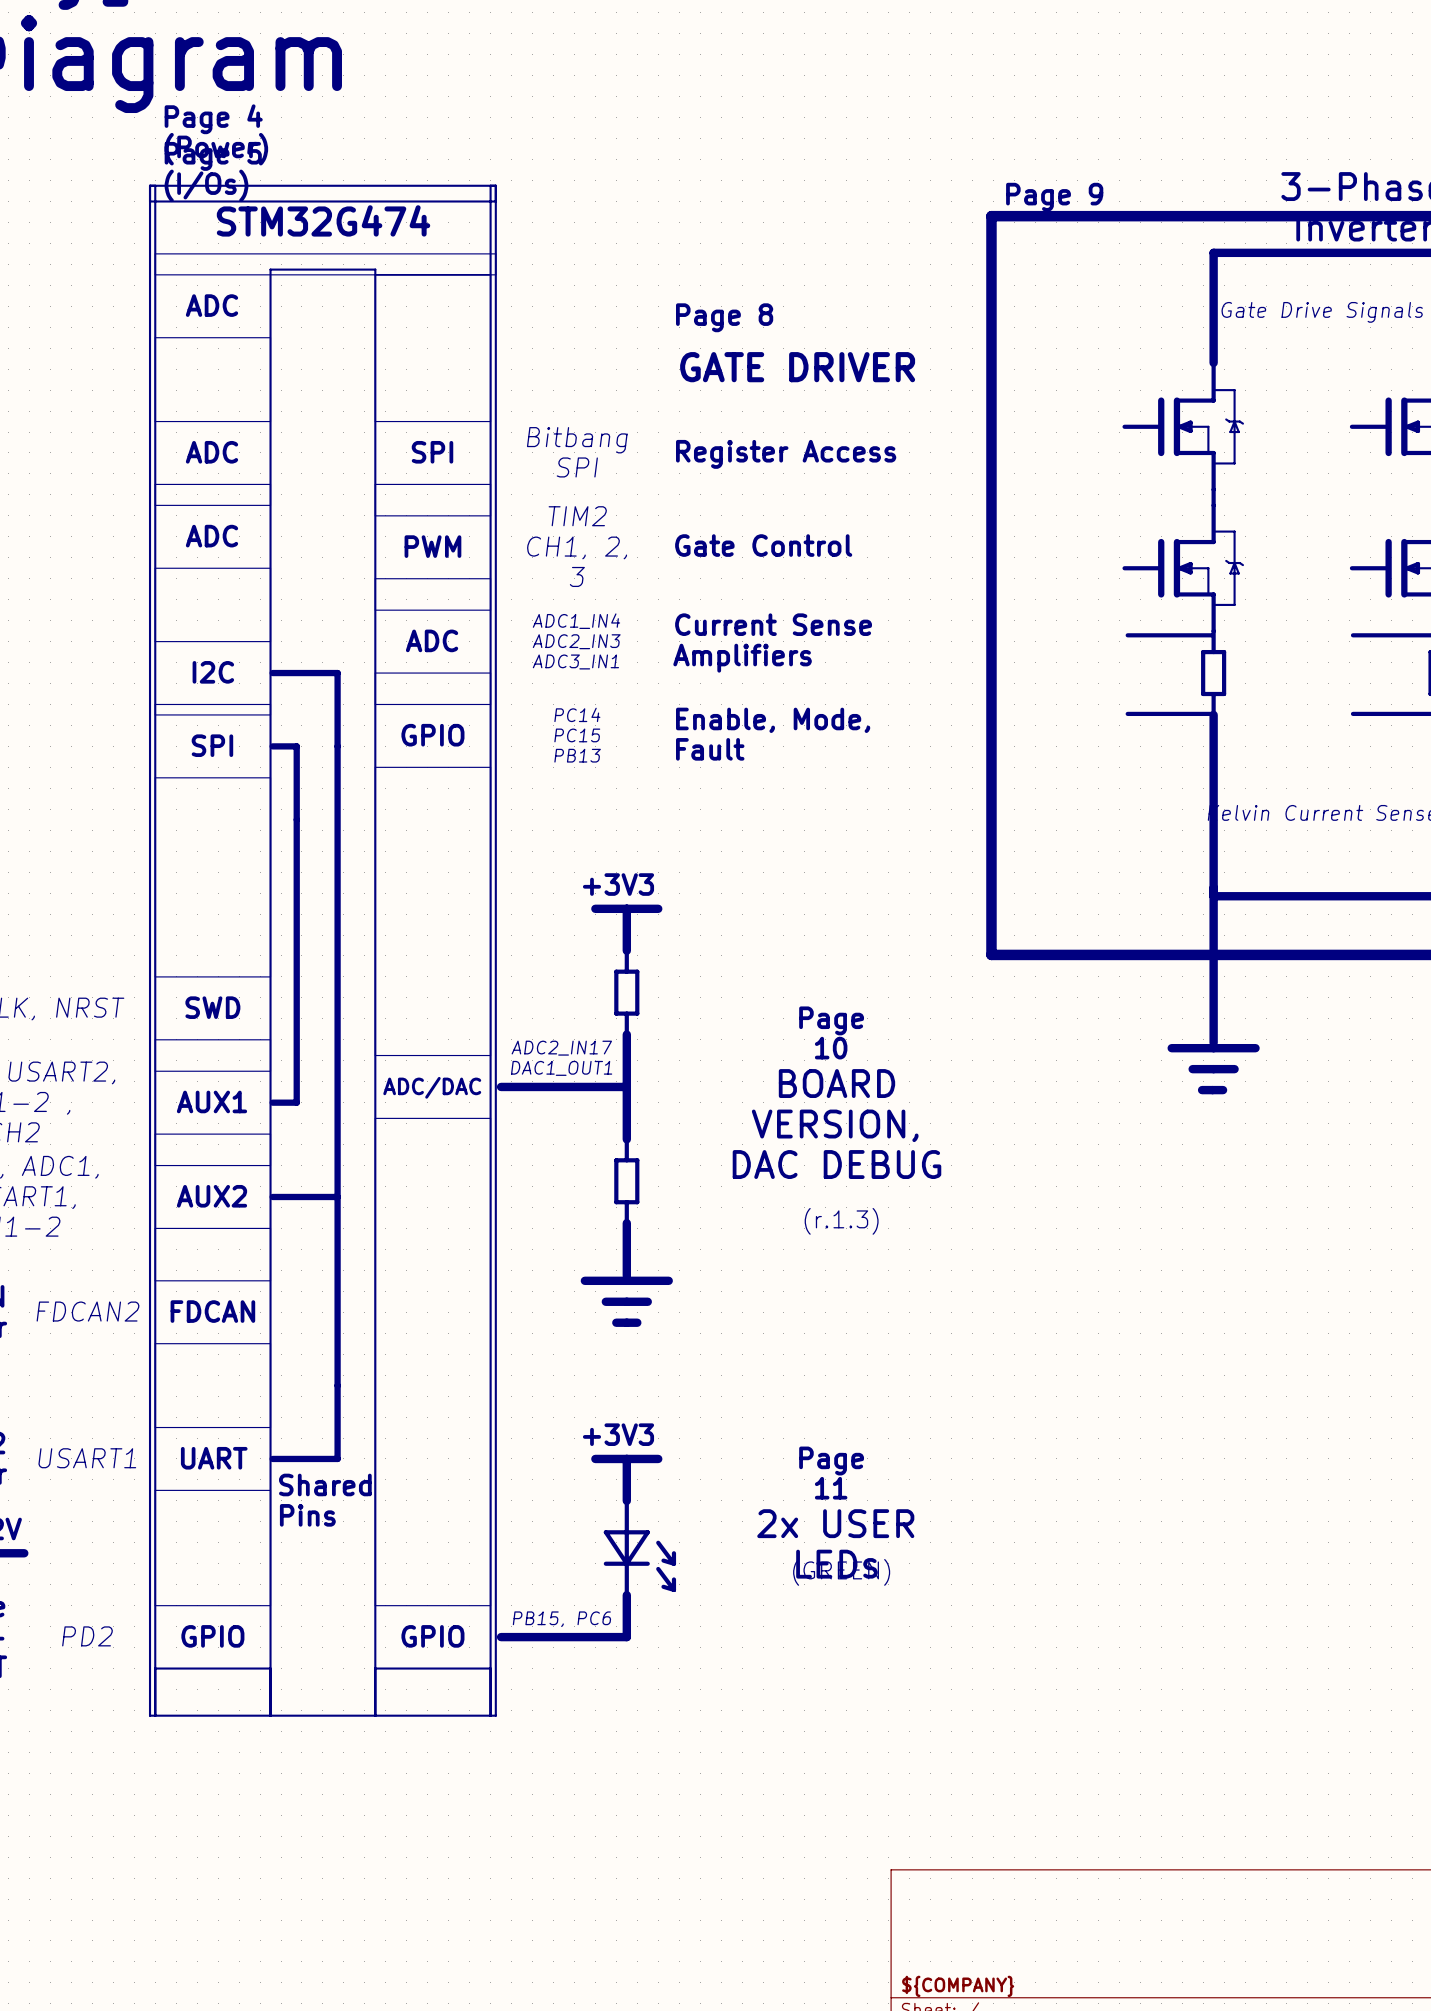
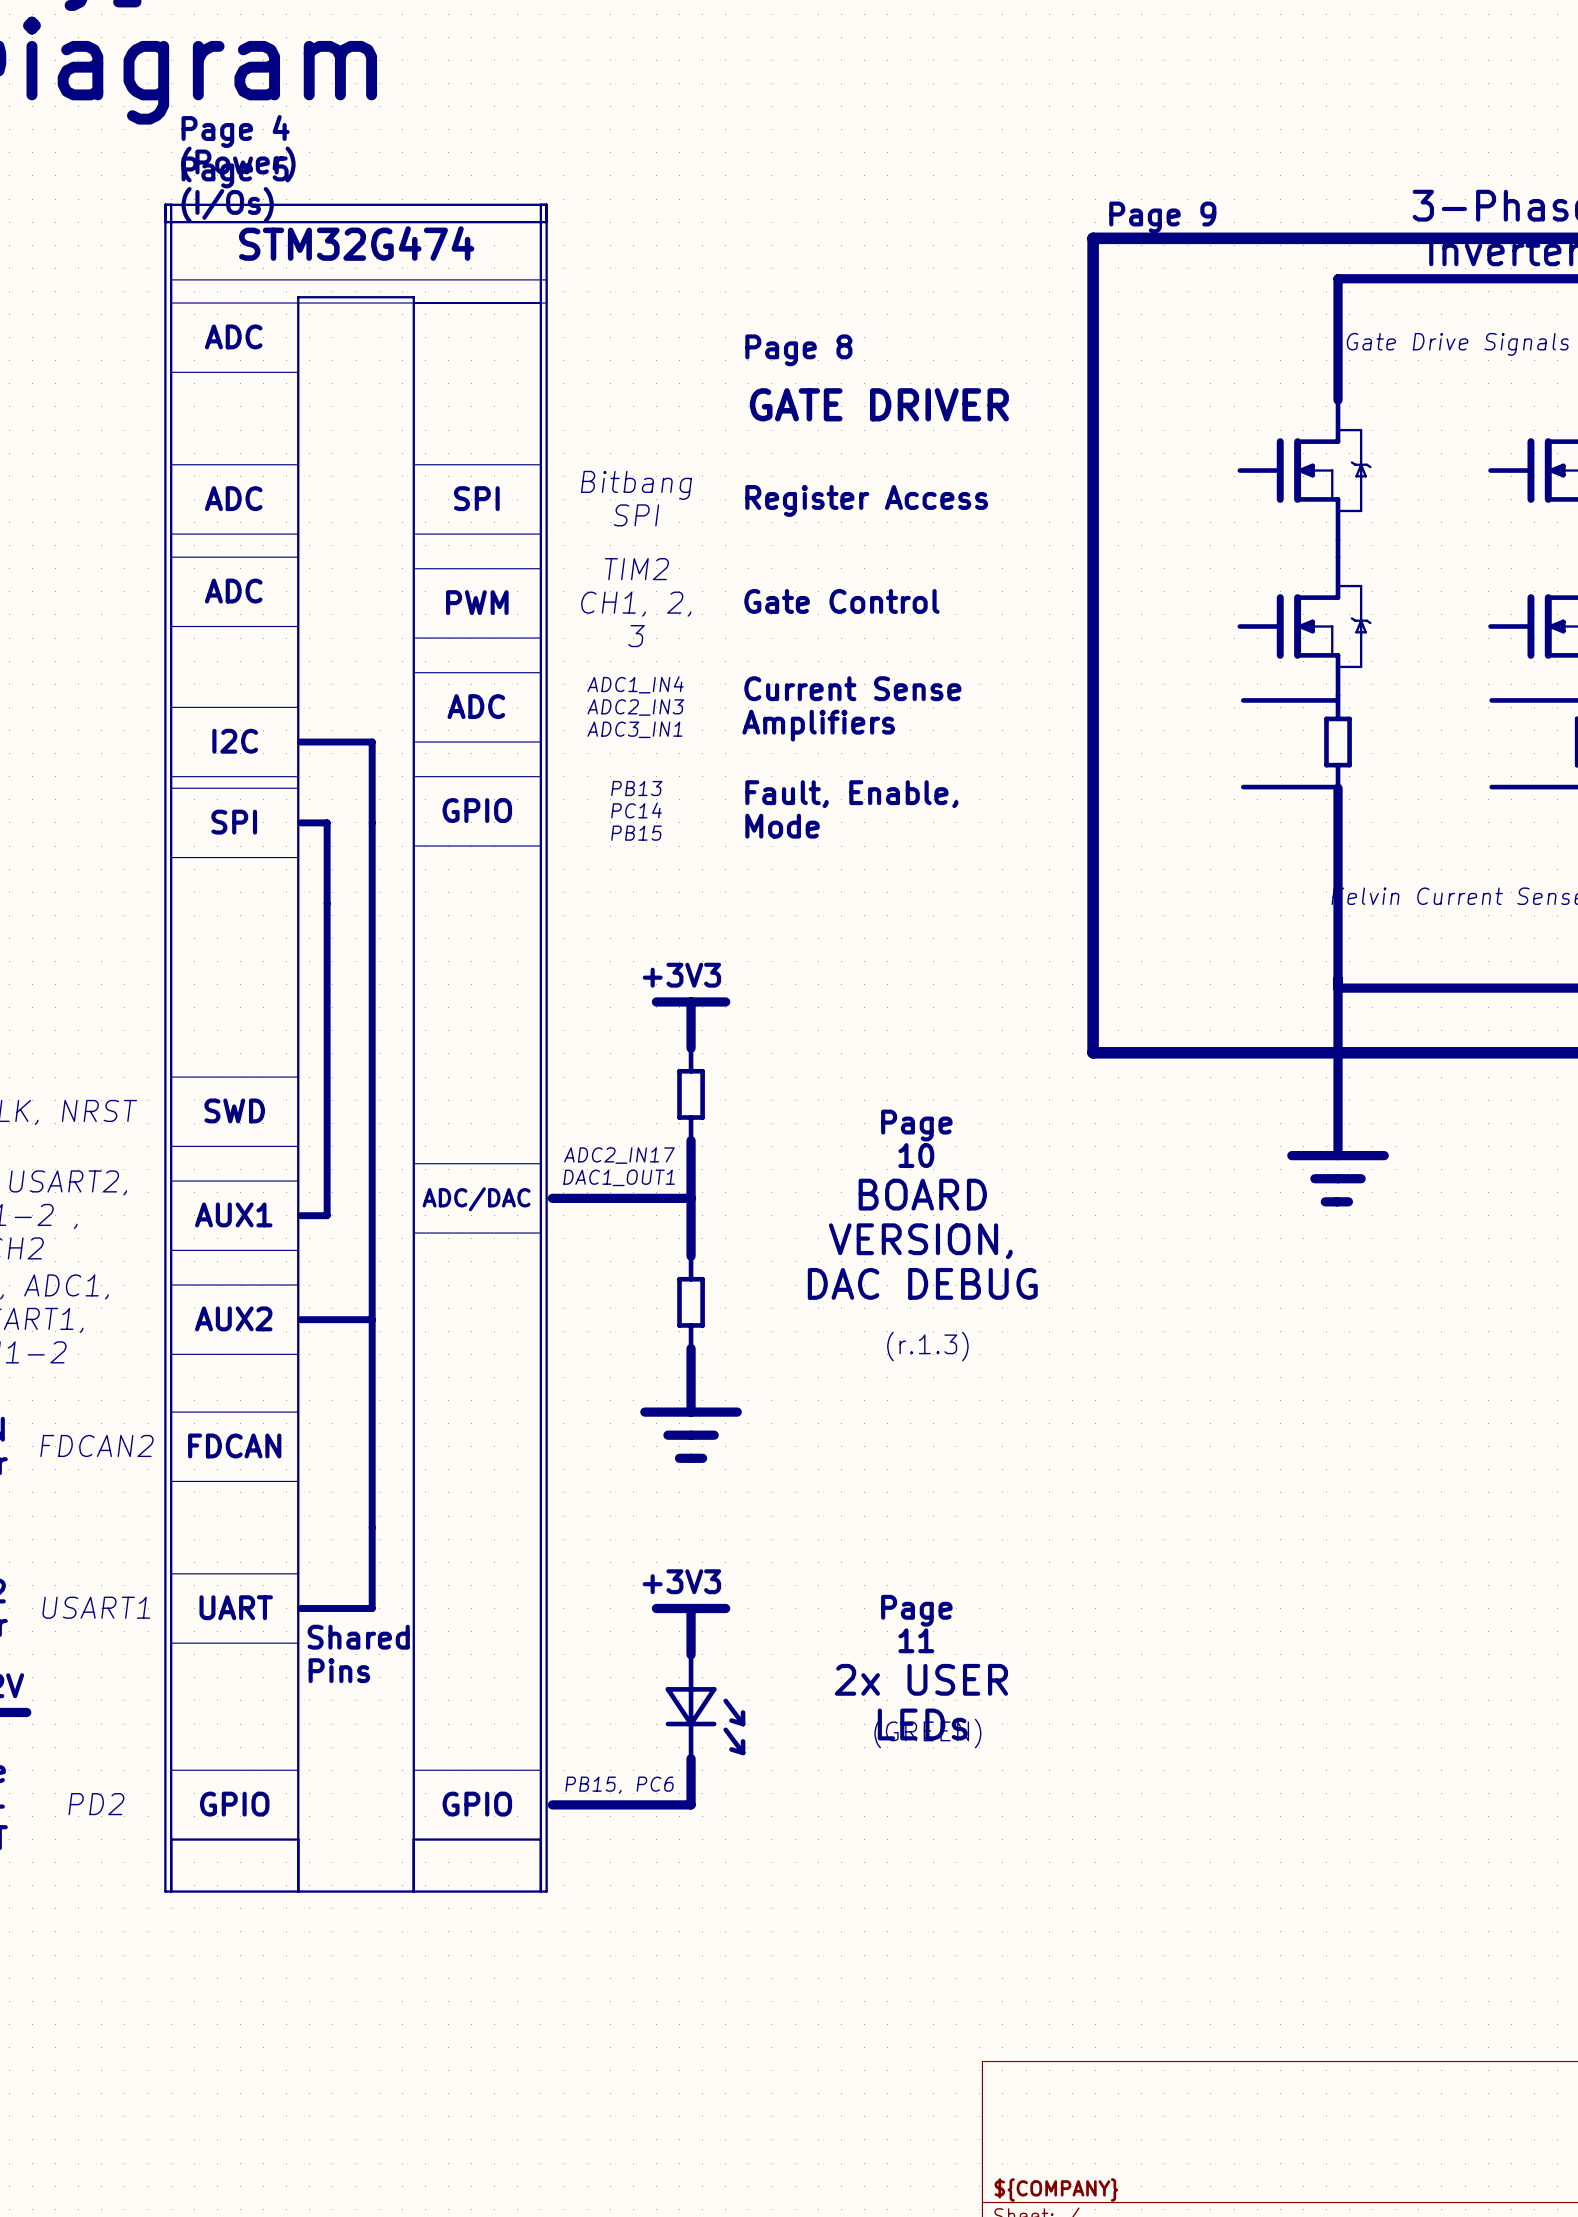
text: PC14 (577, 714) -> PB13 (636, 788)
text: Enable, Mode, (773, 720) -> Fault, Enable, (851, 794)
text: PC15 (577, 735) -> PC14 (636, 810)
text: Fault (710, 749) -> Mode (782, 826)
text: PB13 (577, 755) -> PB15 (636, 833)

